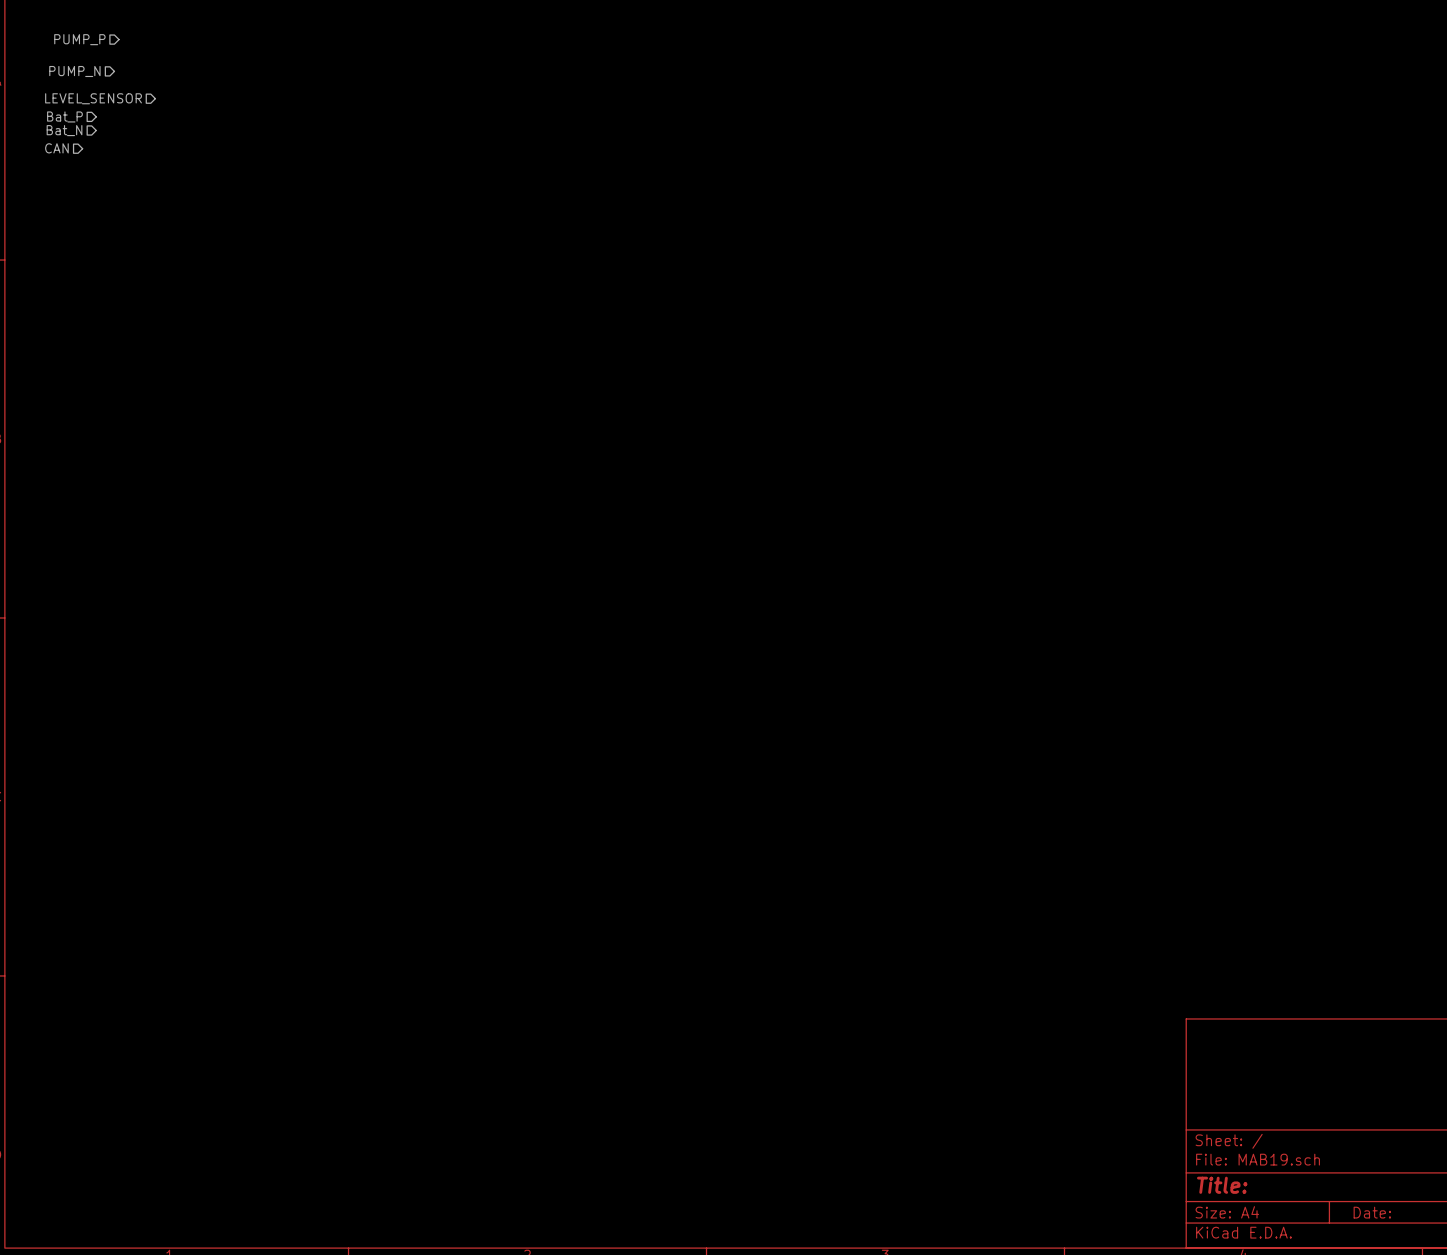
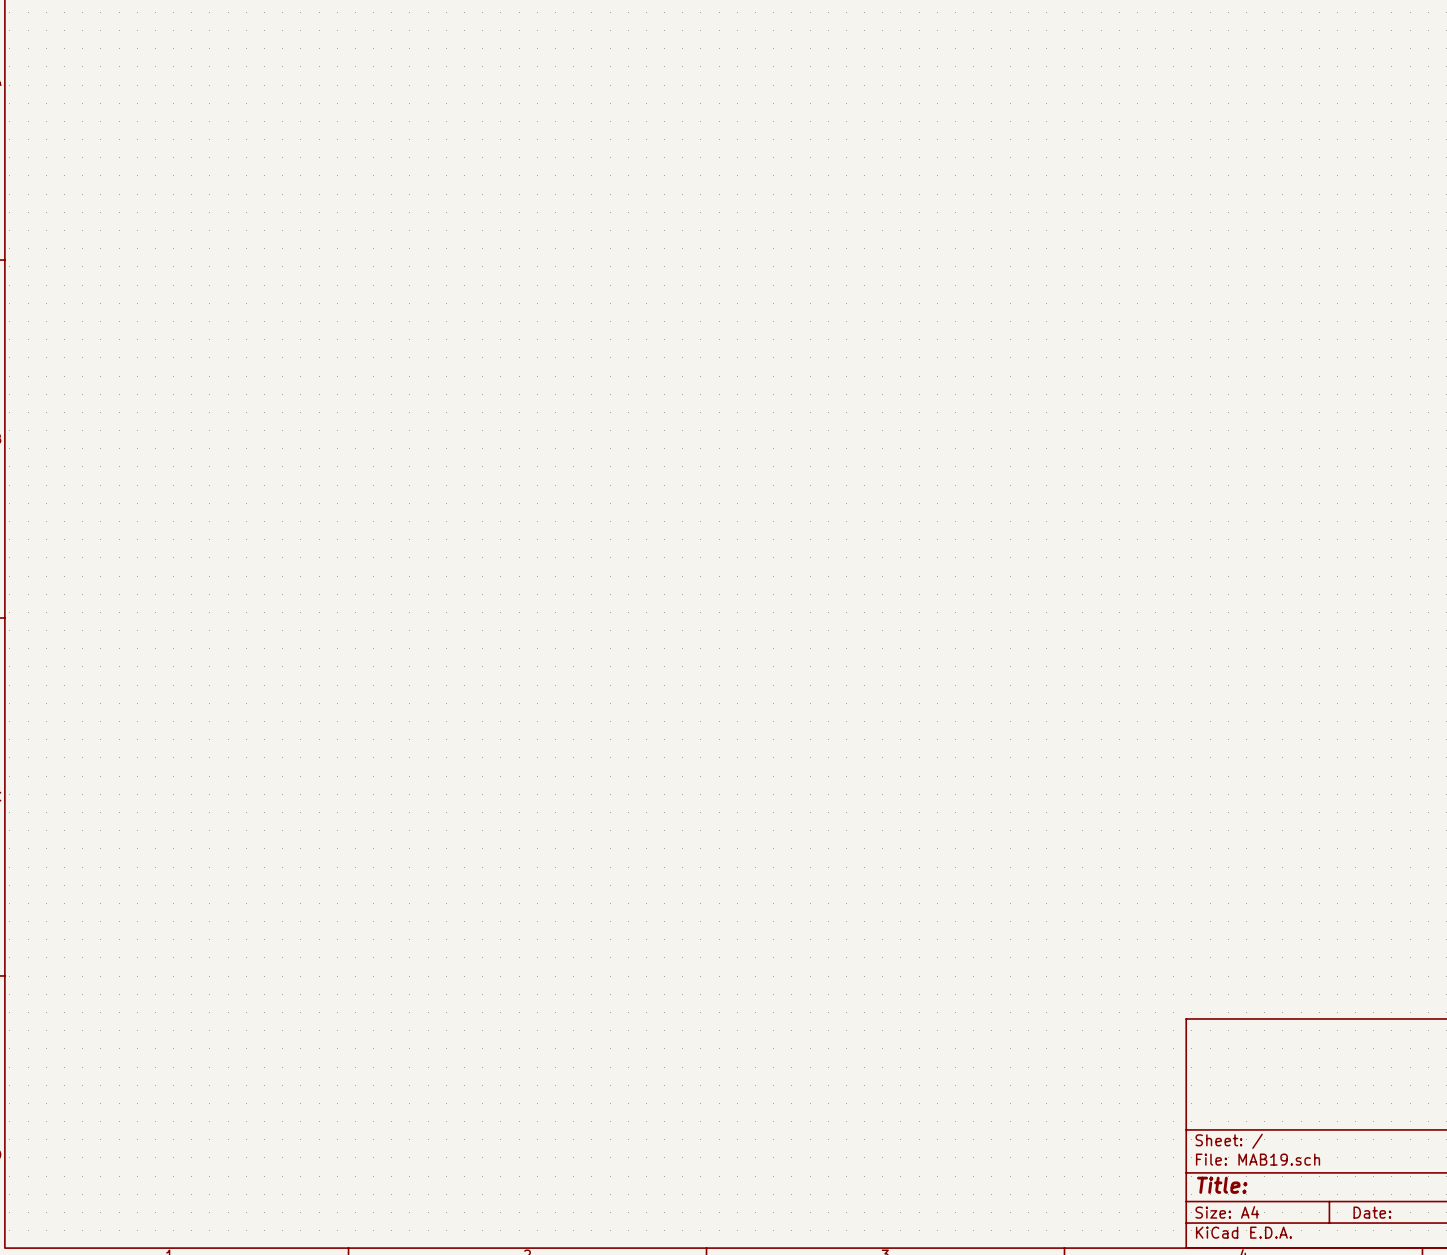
hierarchical label: PUMP_P (79, 39) -> none
hierarchical label: PUMP_N (74, 71) -> none
hierarchical label: LEVEL_SENSOR (93, 98) -> none
hierarchical label: Bat_P (64, 116) -> none
hierarchical label: Bat_N (64, 130) -> none
hierarchical label: CAN (56, 148) -> none

